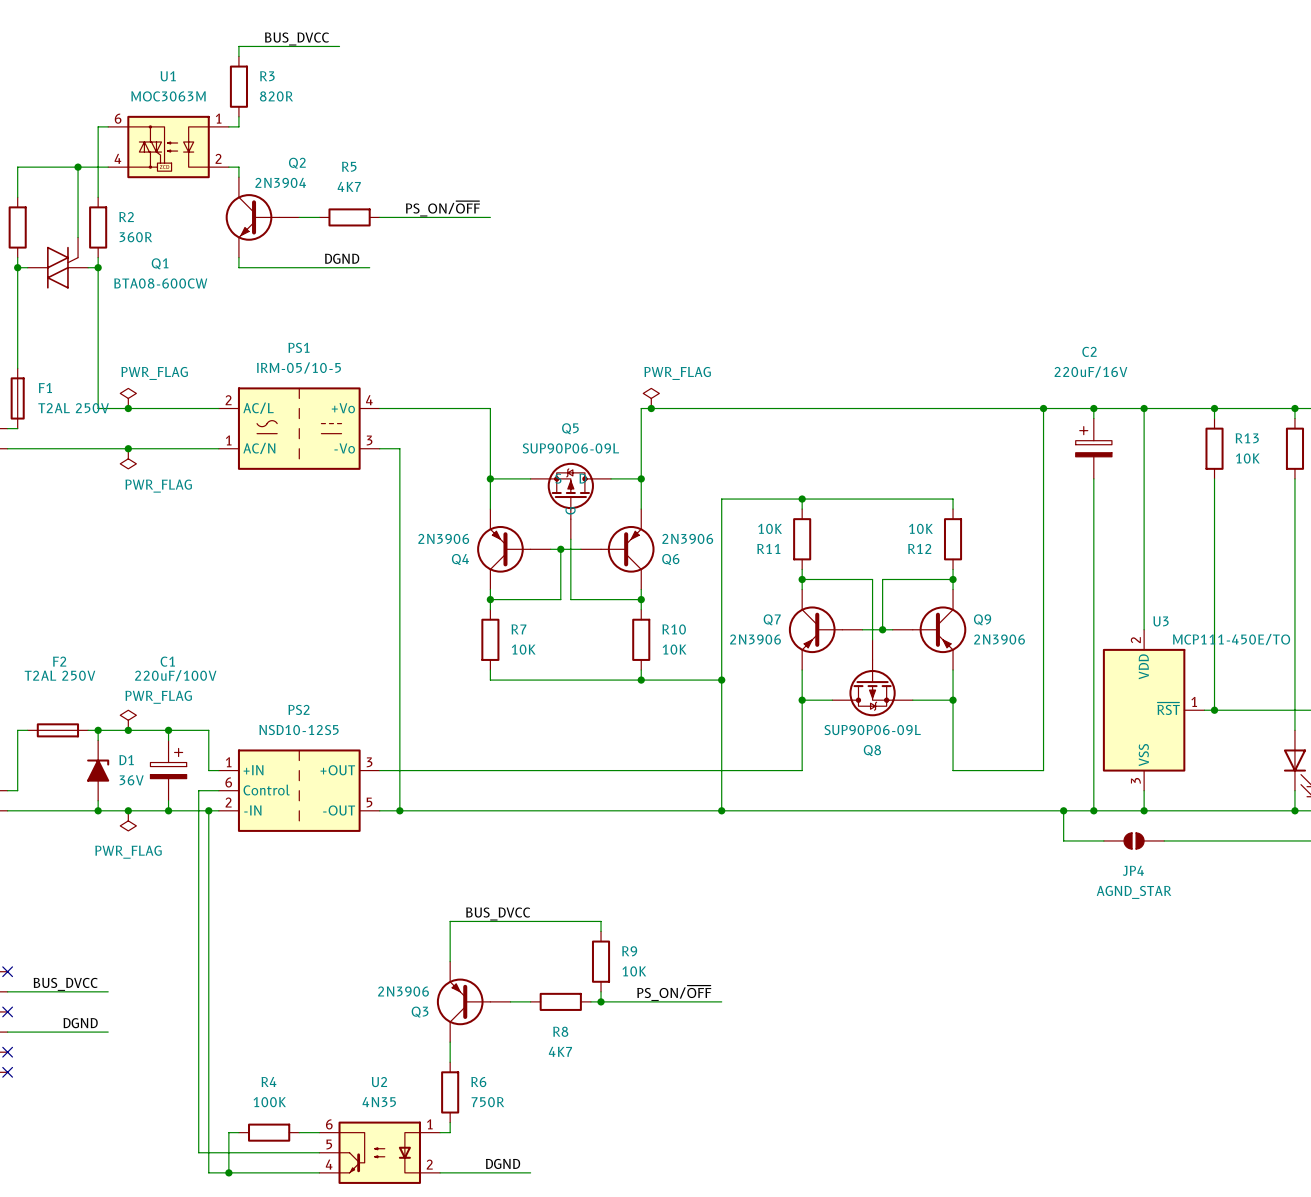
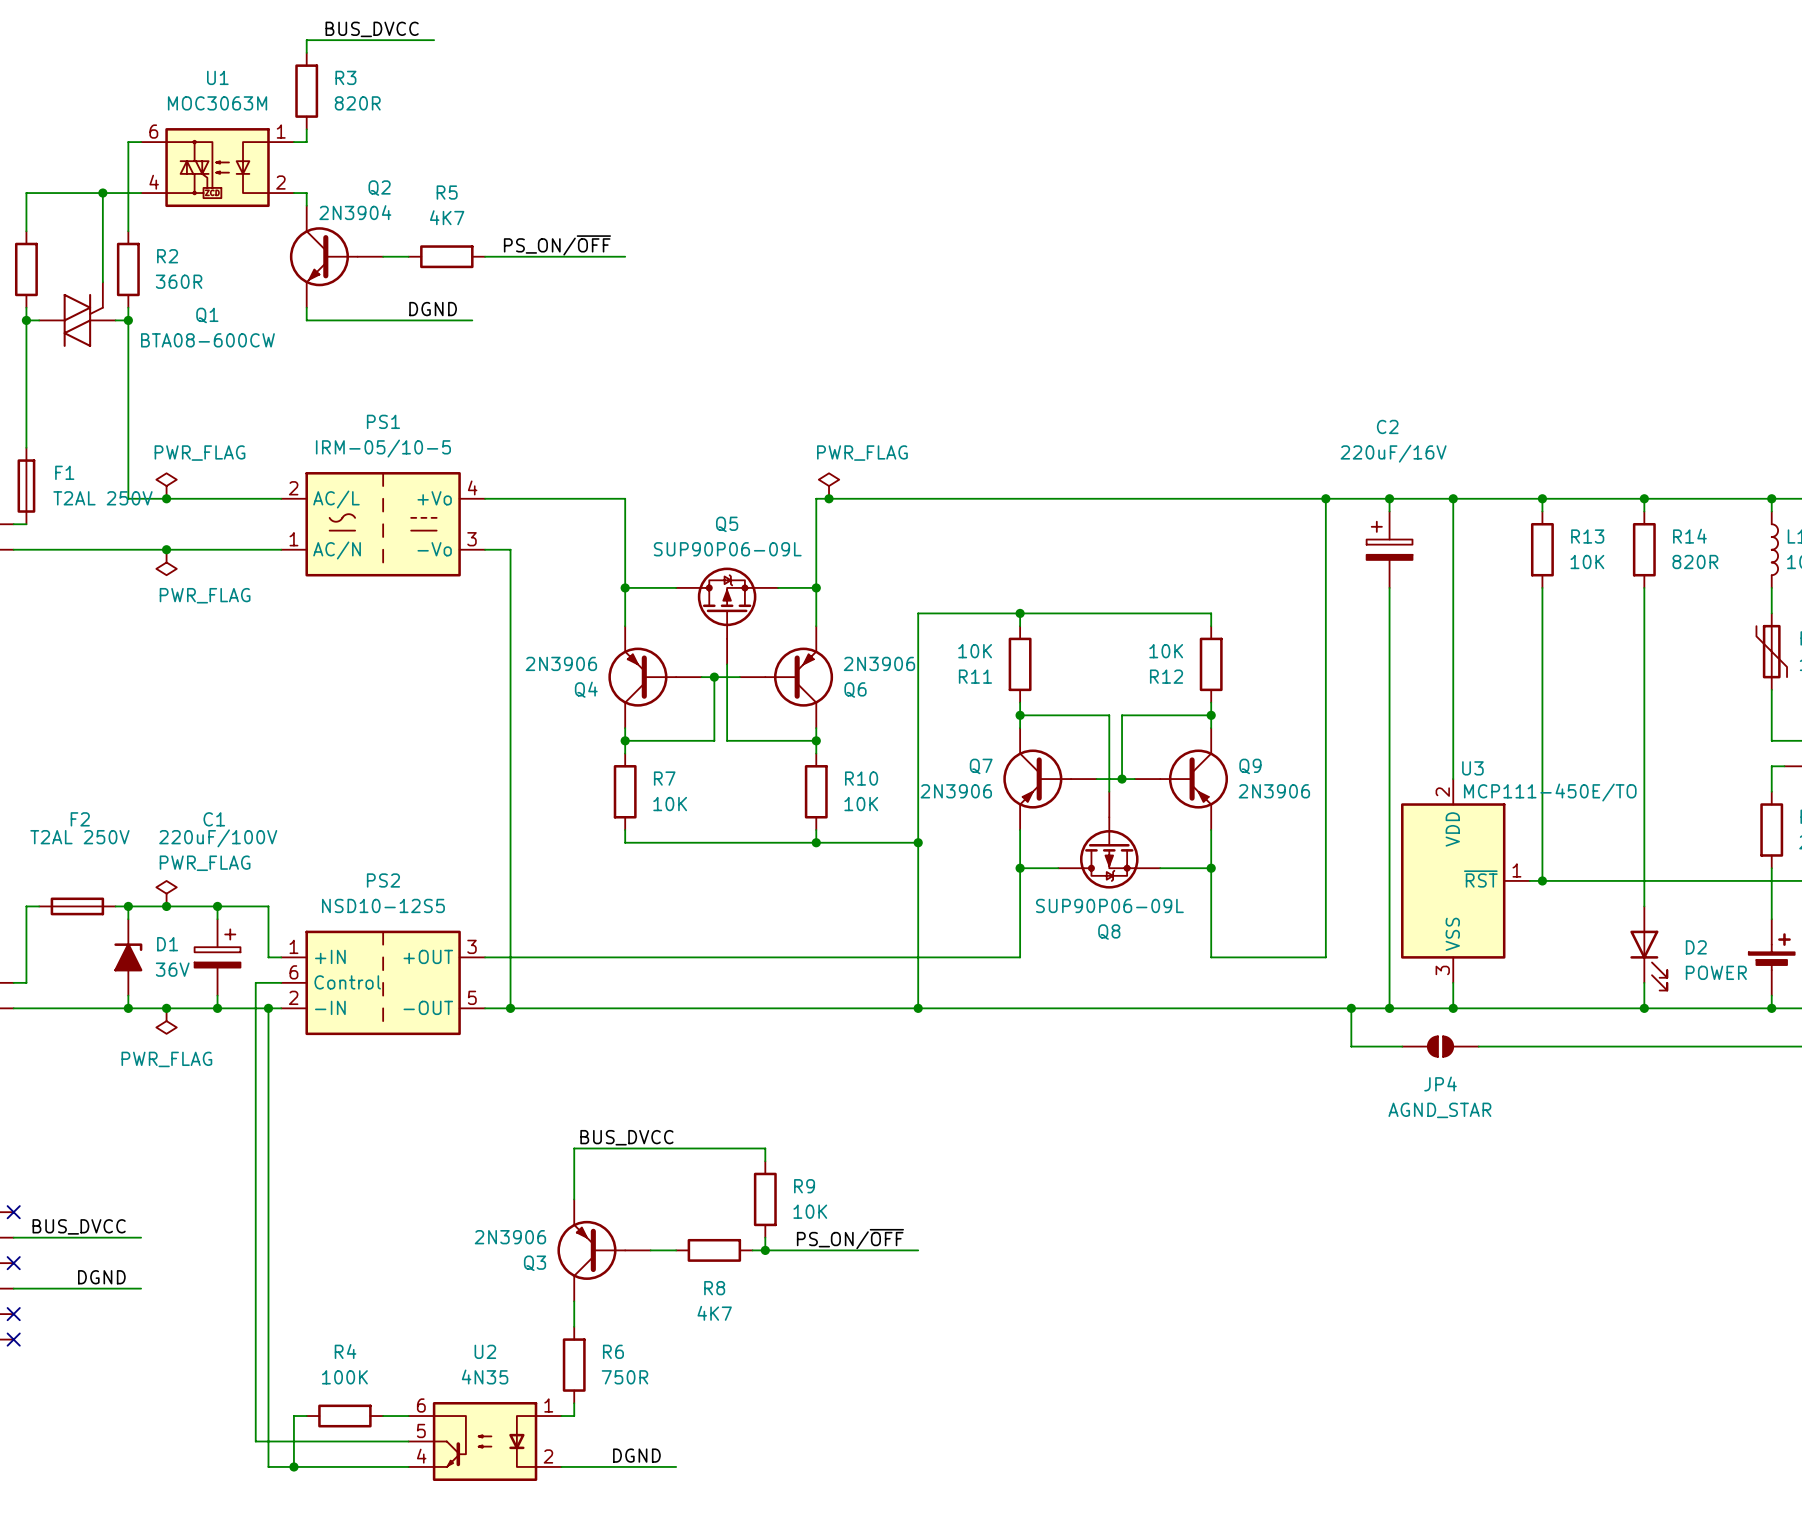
Q5 symbol: [530, 462, 612, 540] -> [676, 567, 779, 665]

